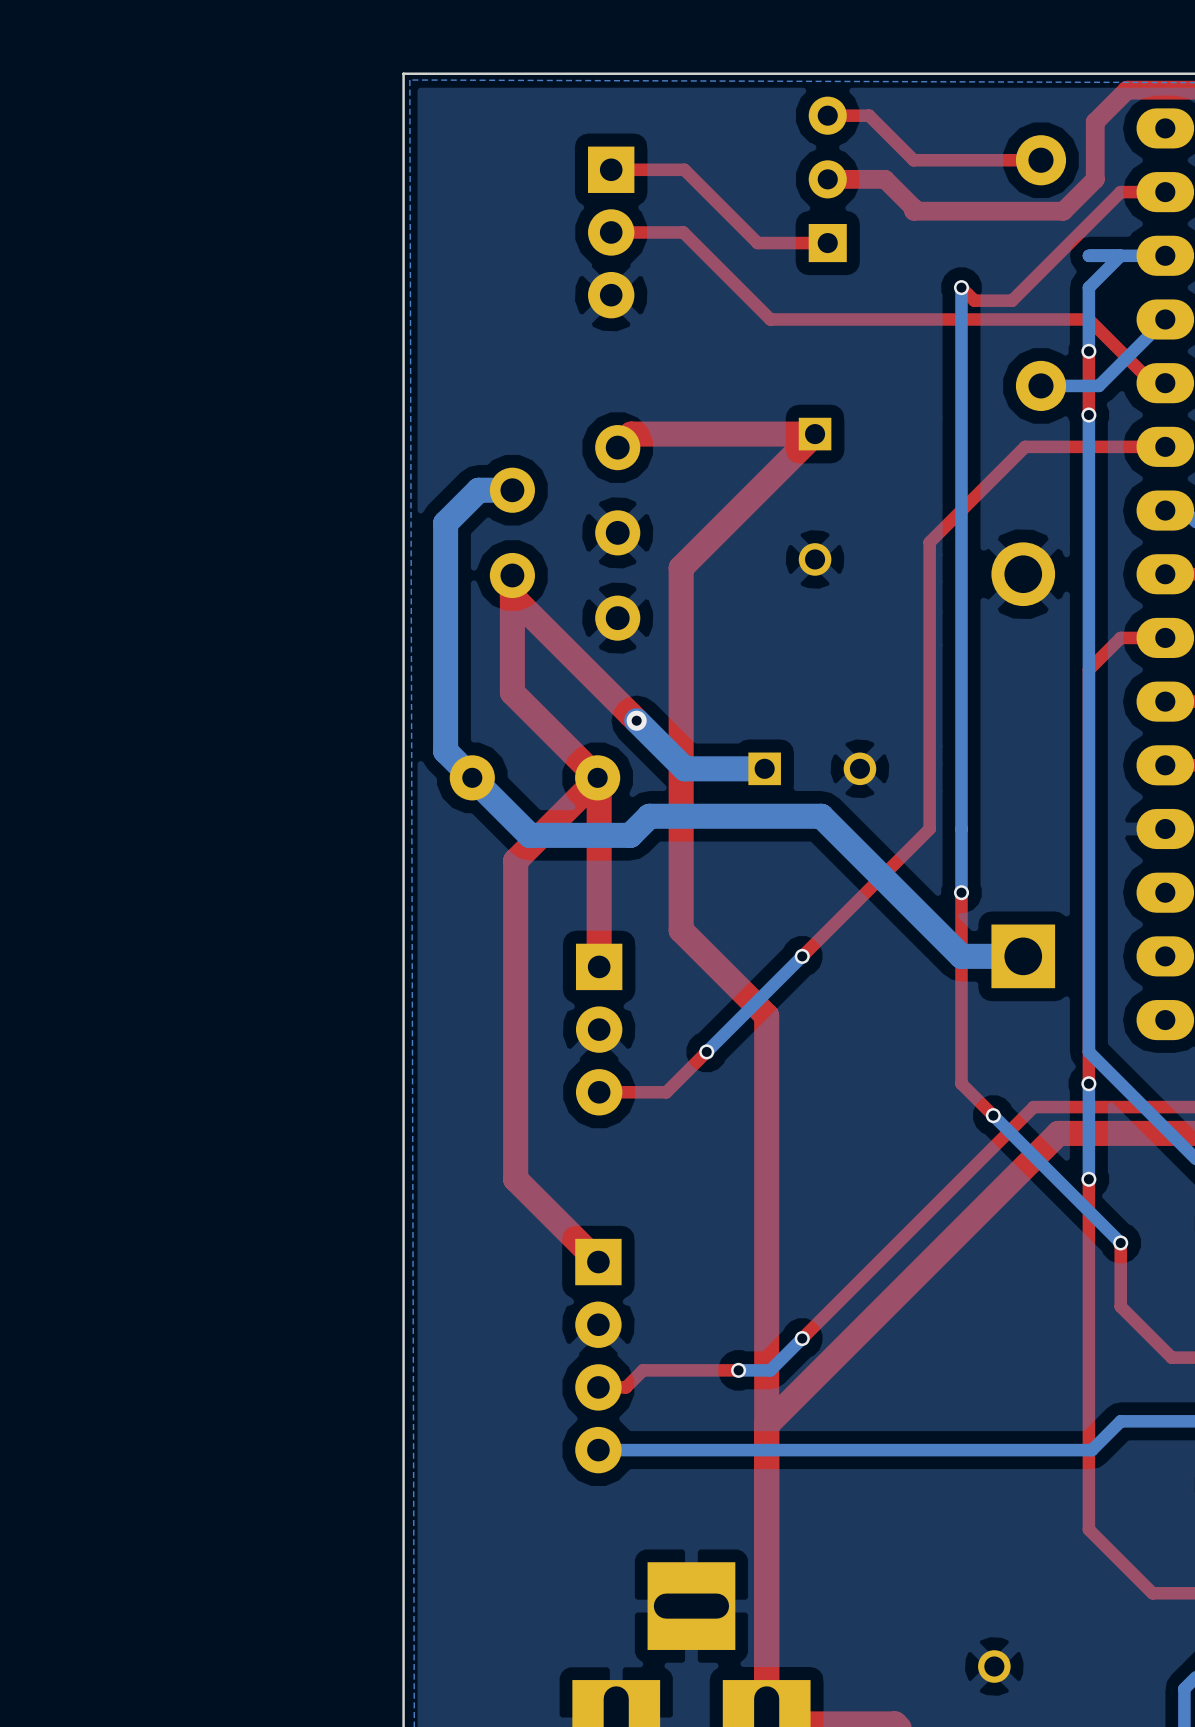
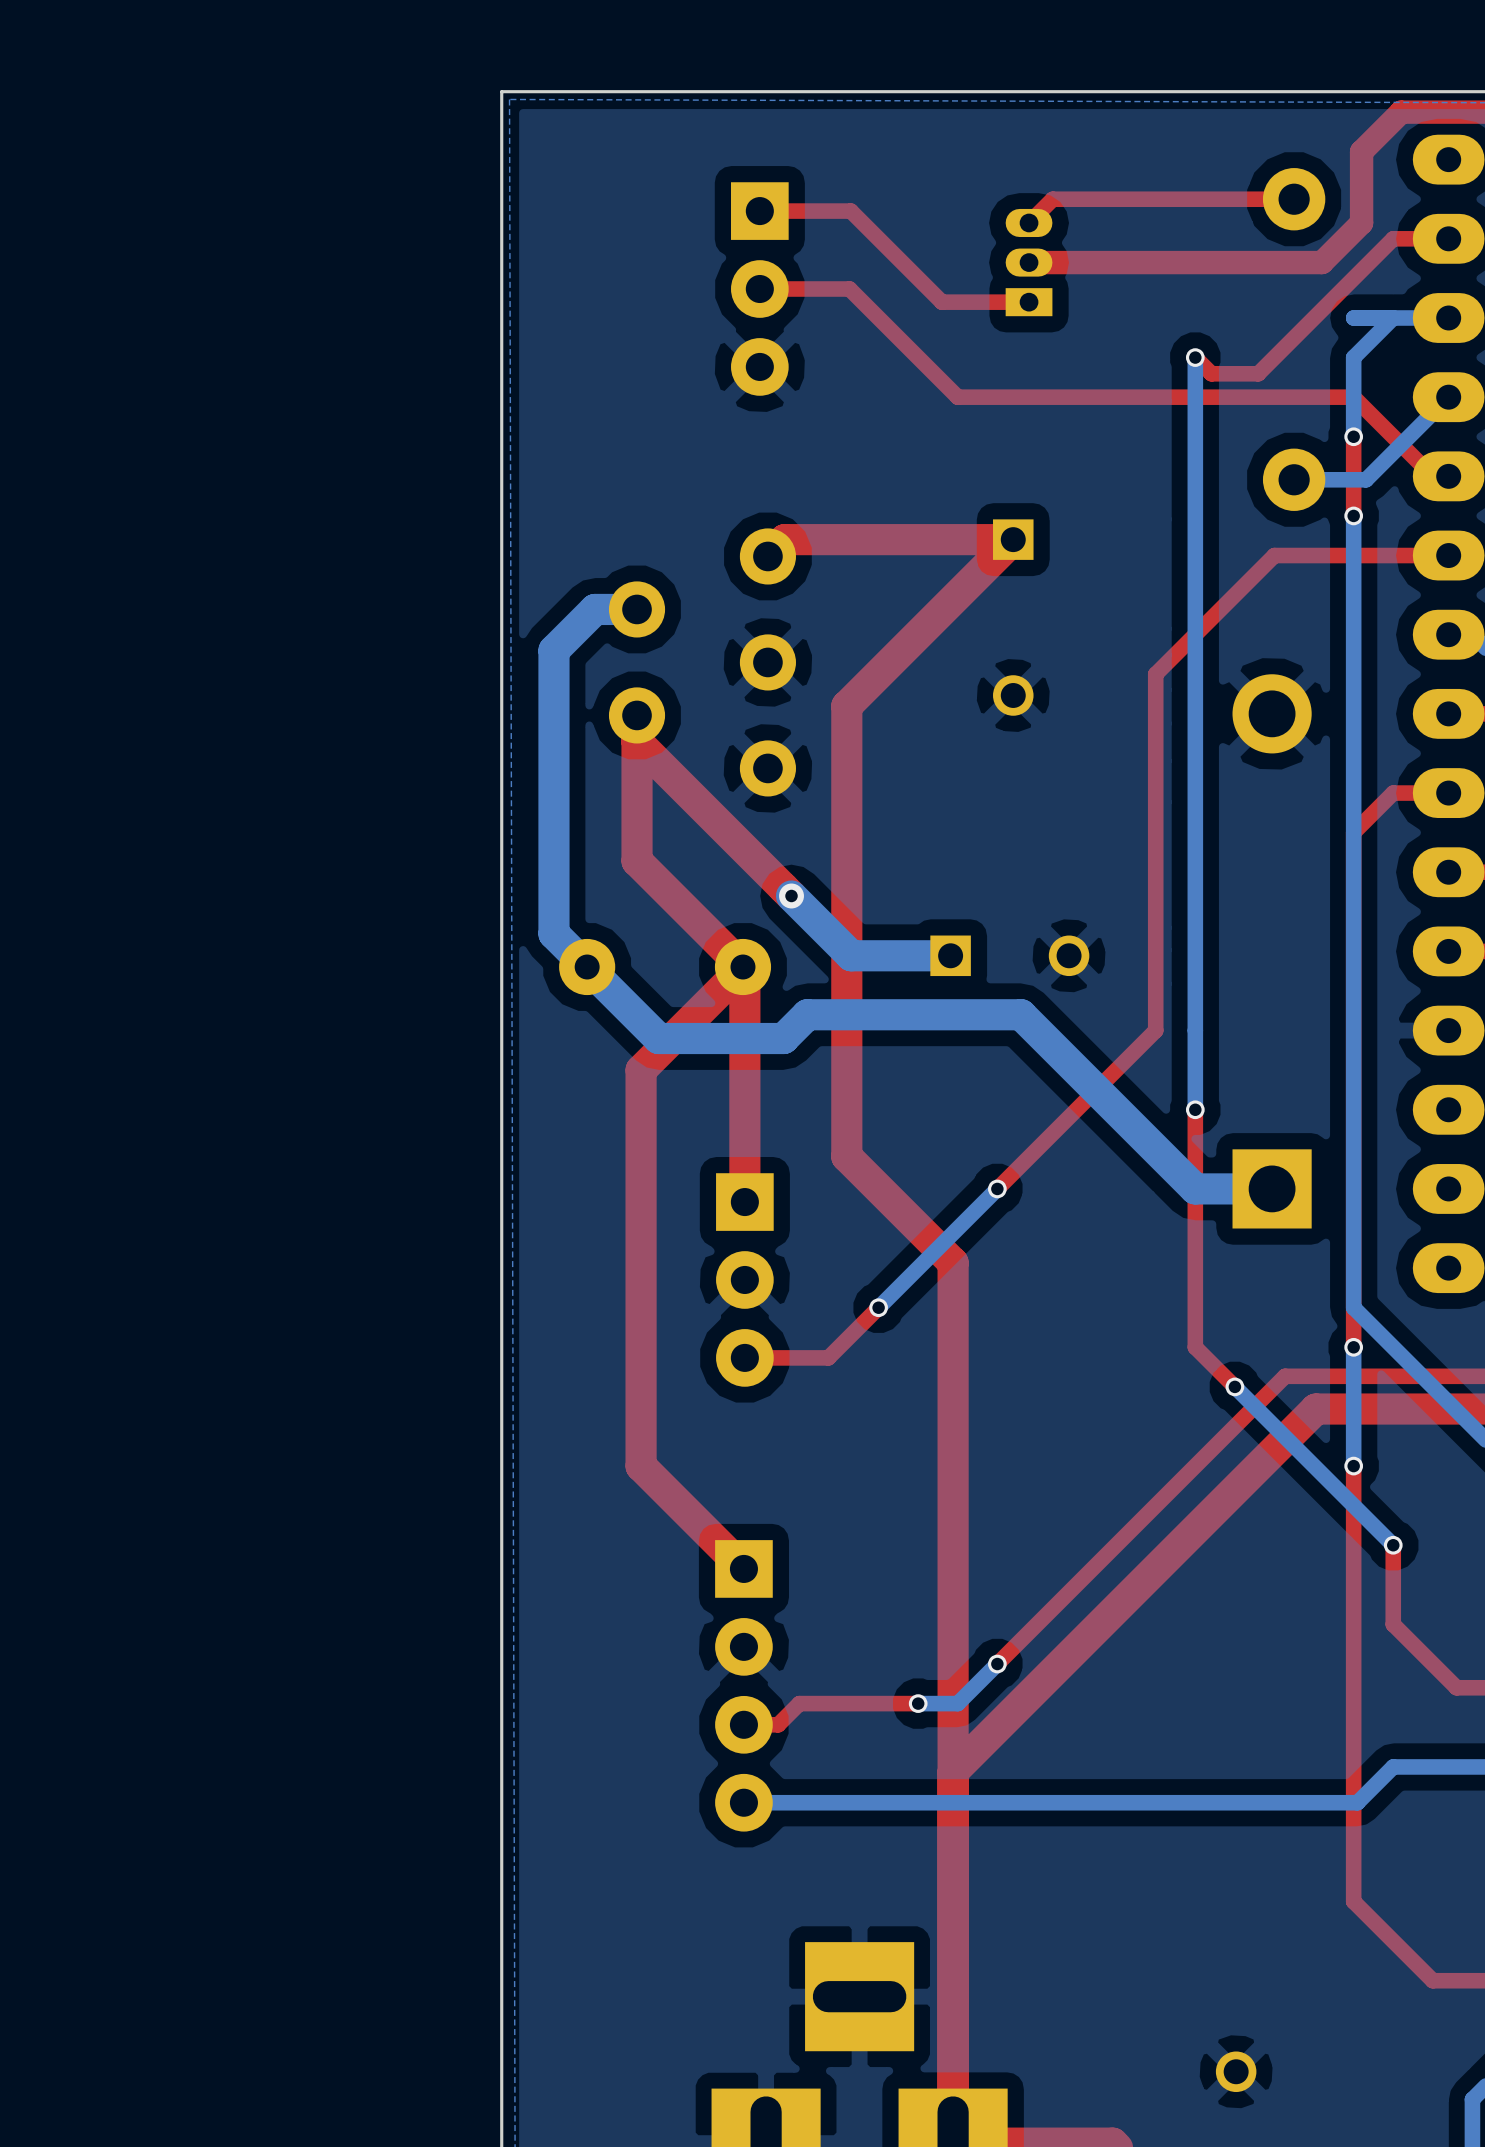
top track: (827, 115) (869, 115) (913, 160) -> (1029, 222) (1052, 199) (1135, 199)
top track: (827, 179) (885, 179) (913, 208) (913, 211) -> (1029, 262) (1135, 262)
part: (827, 179) -> none
part: none -> (1029, 262)

